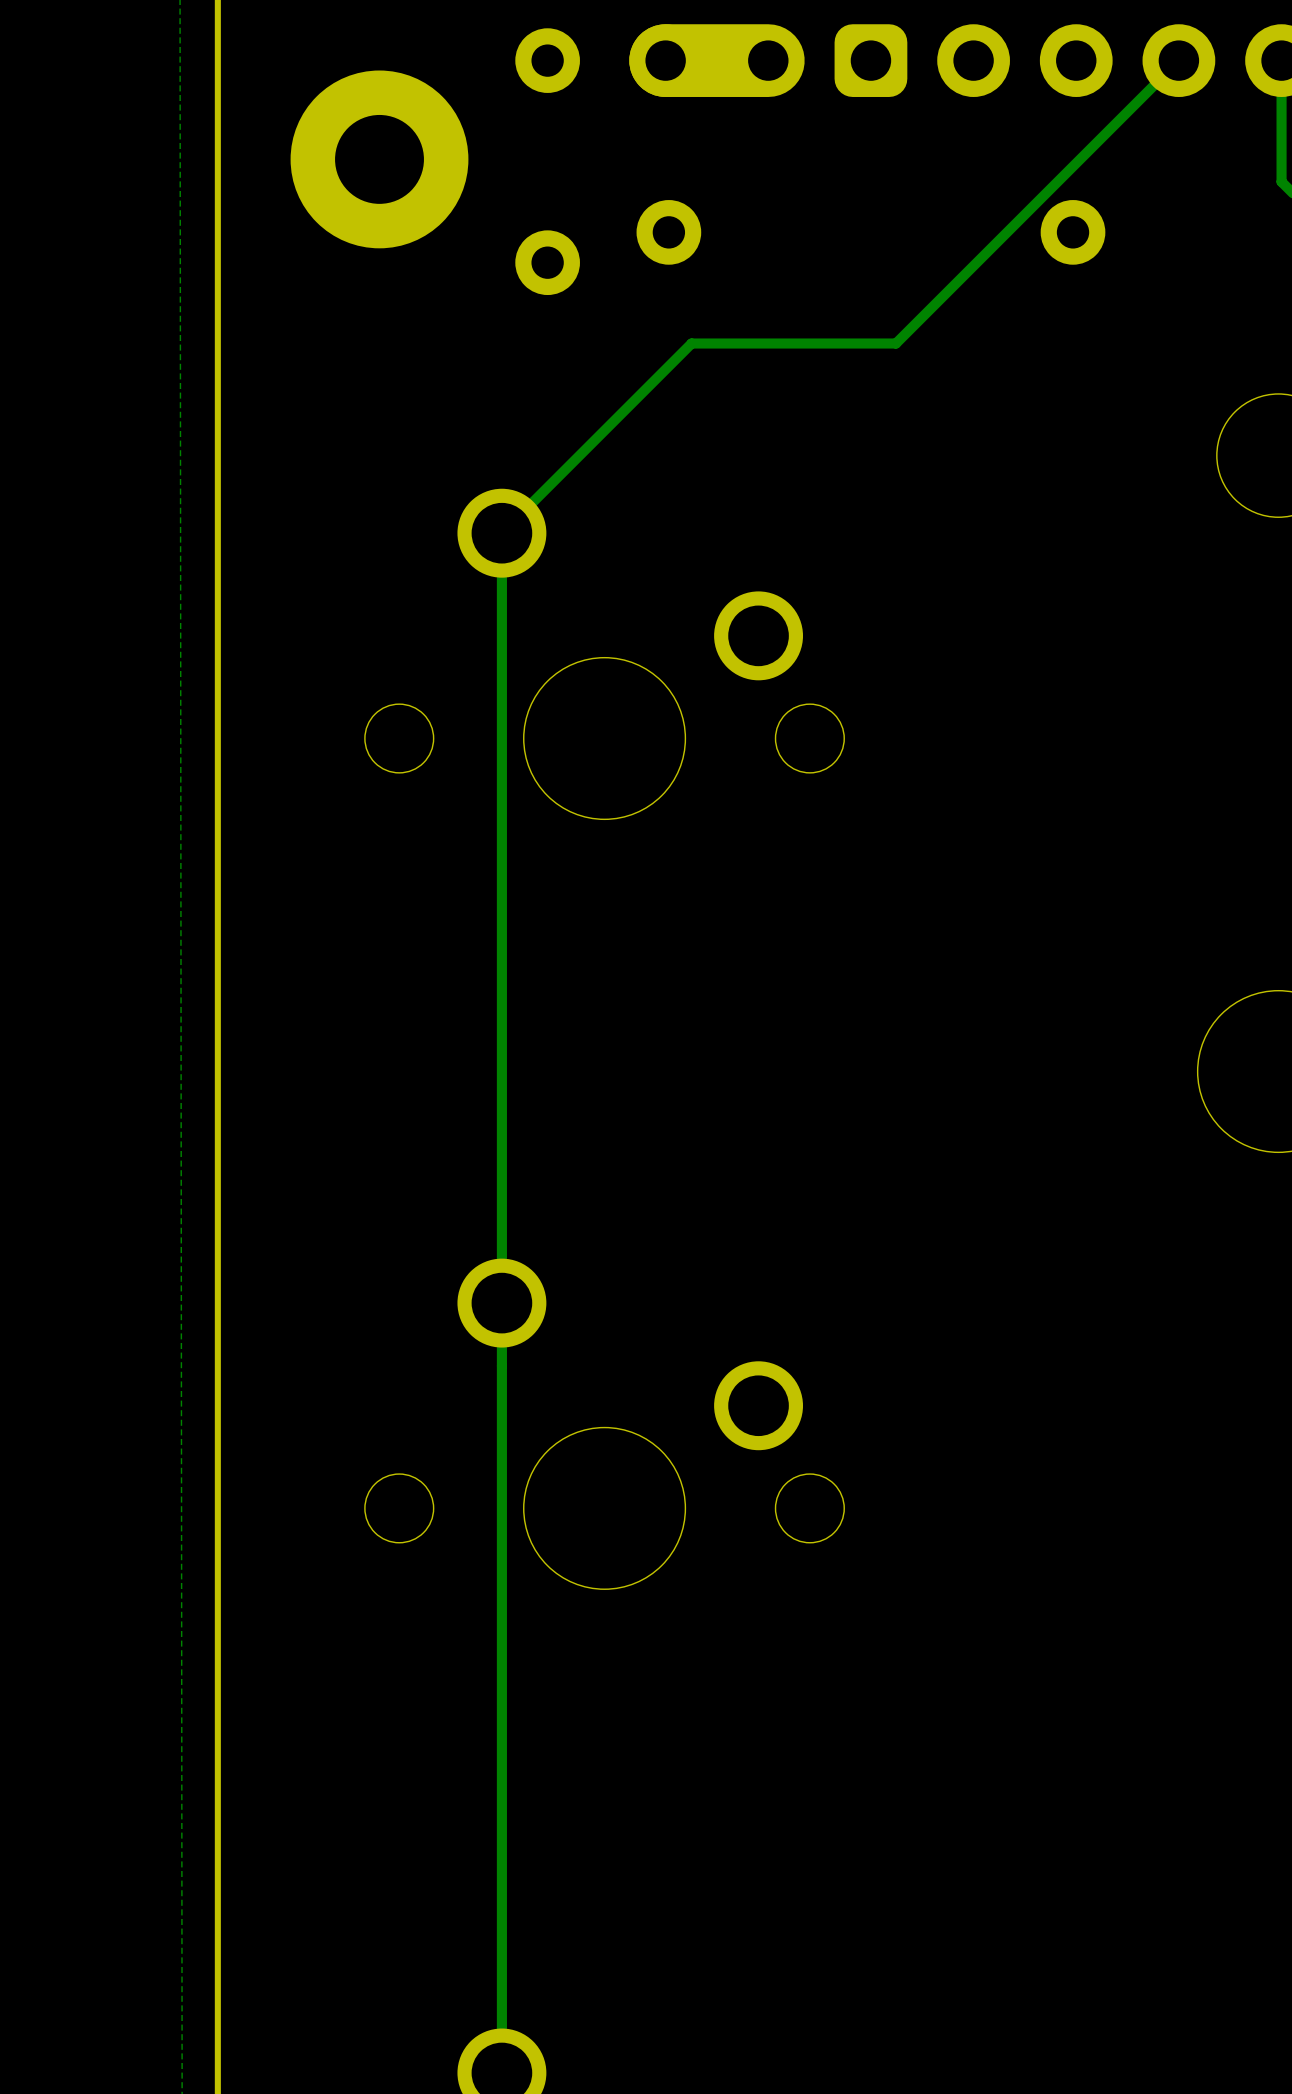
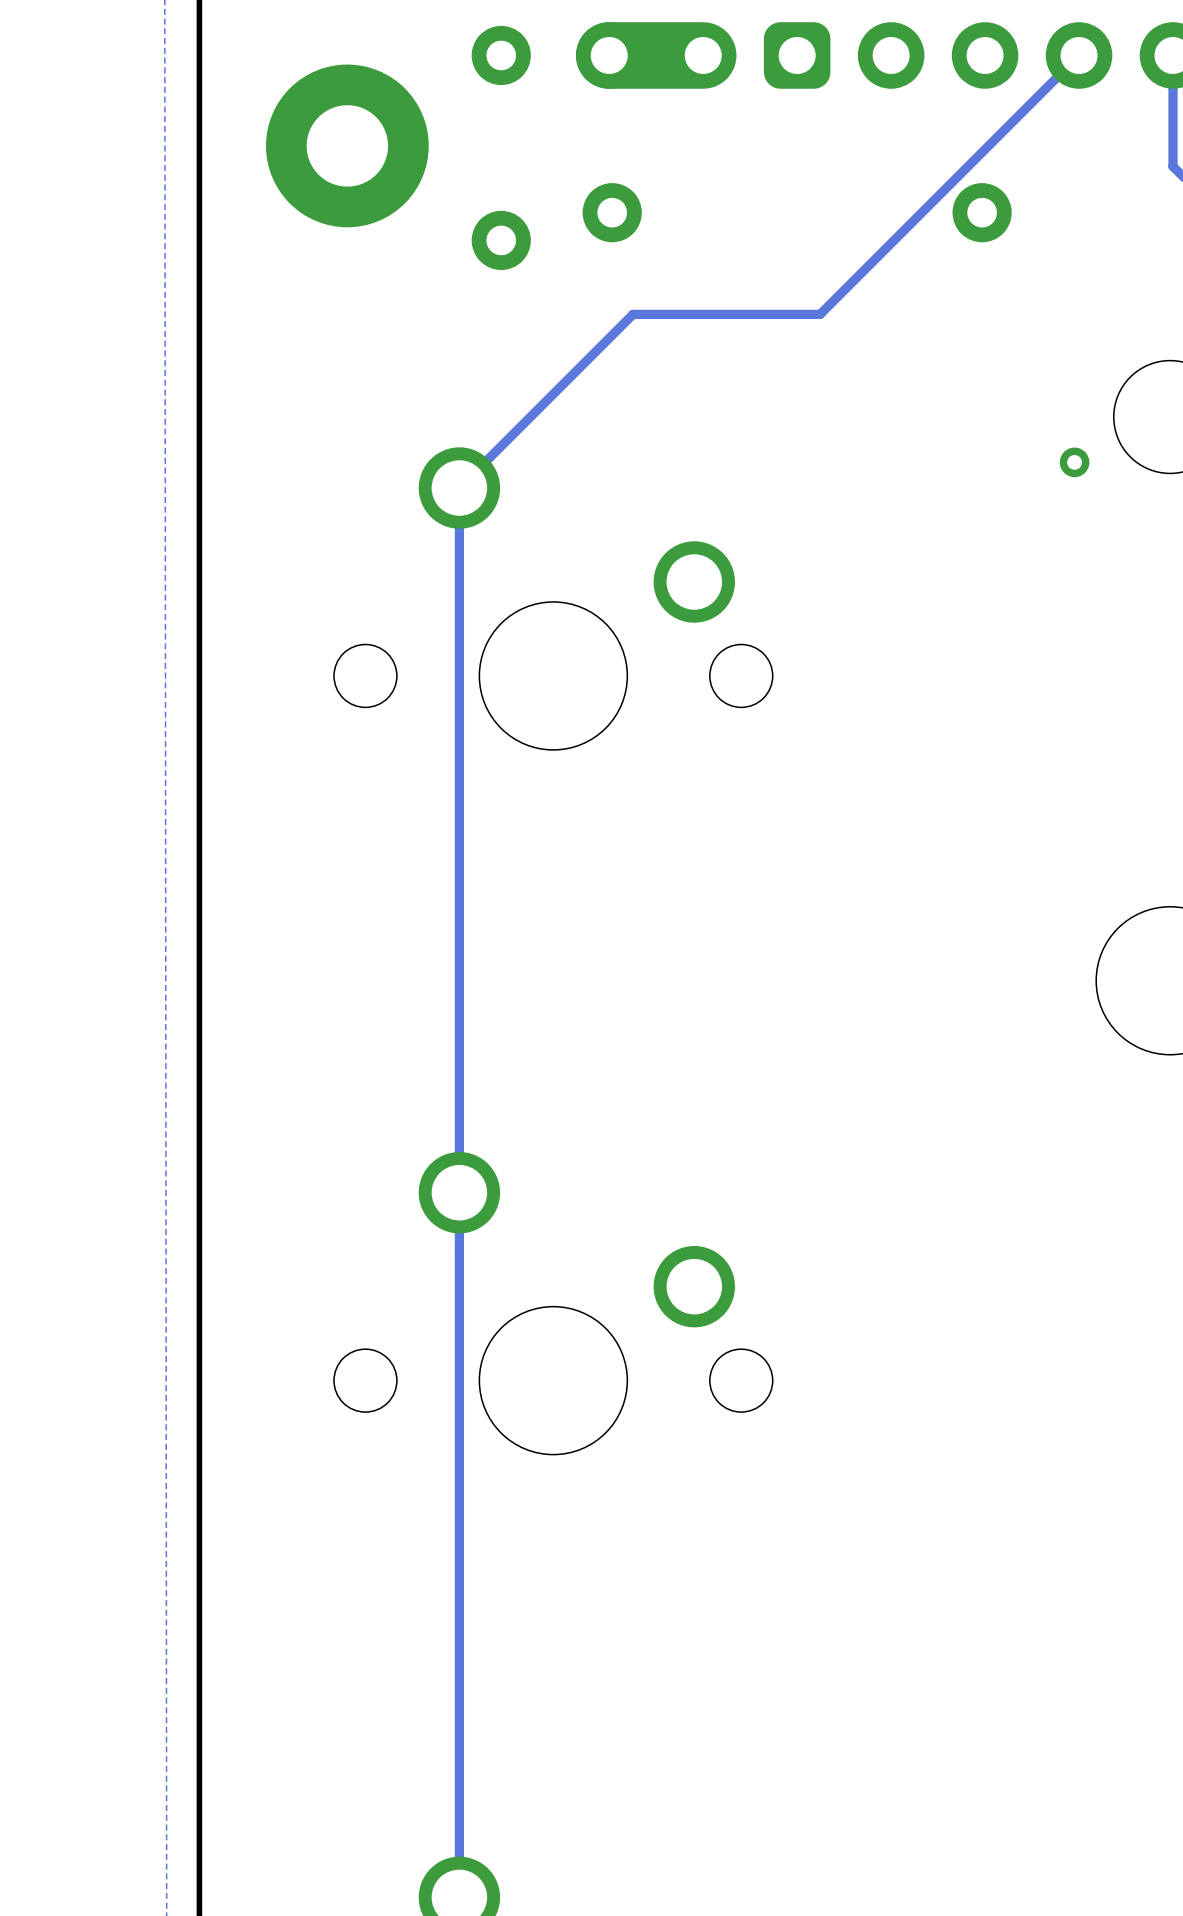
via: none -> (1074, 462)

